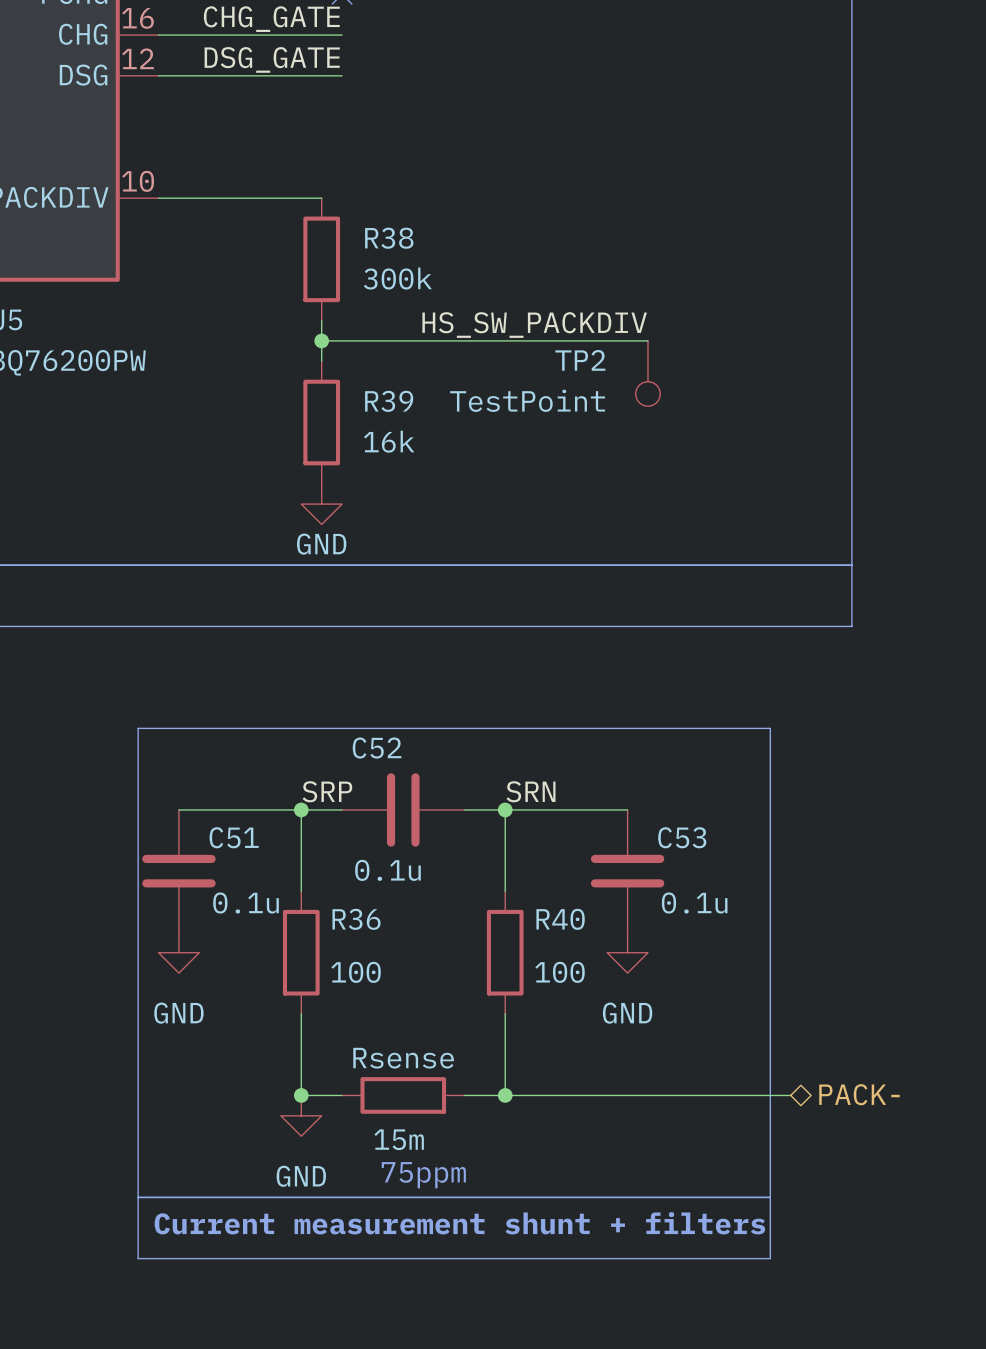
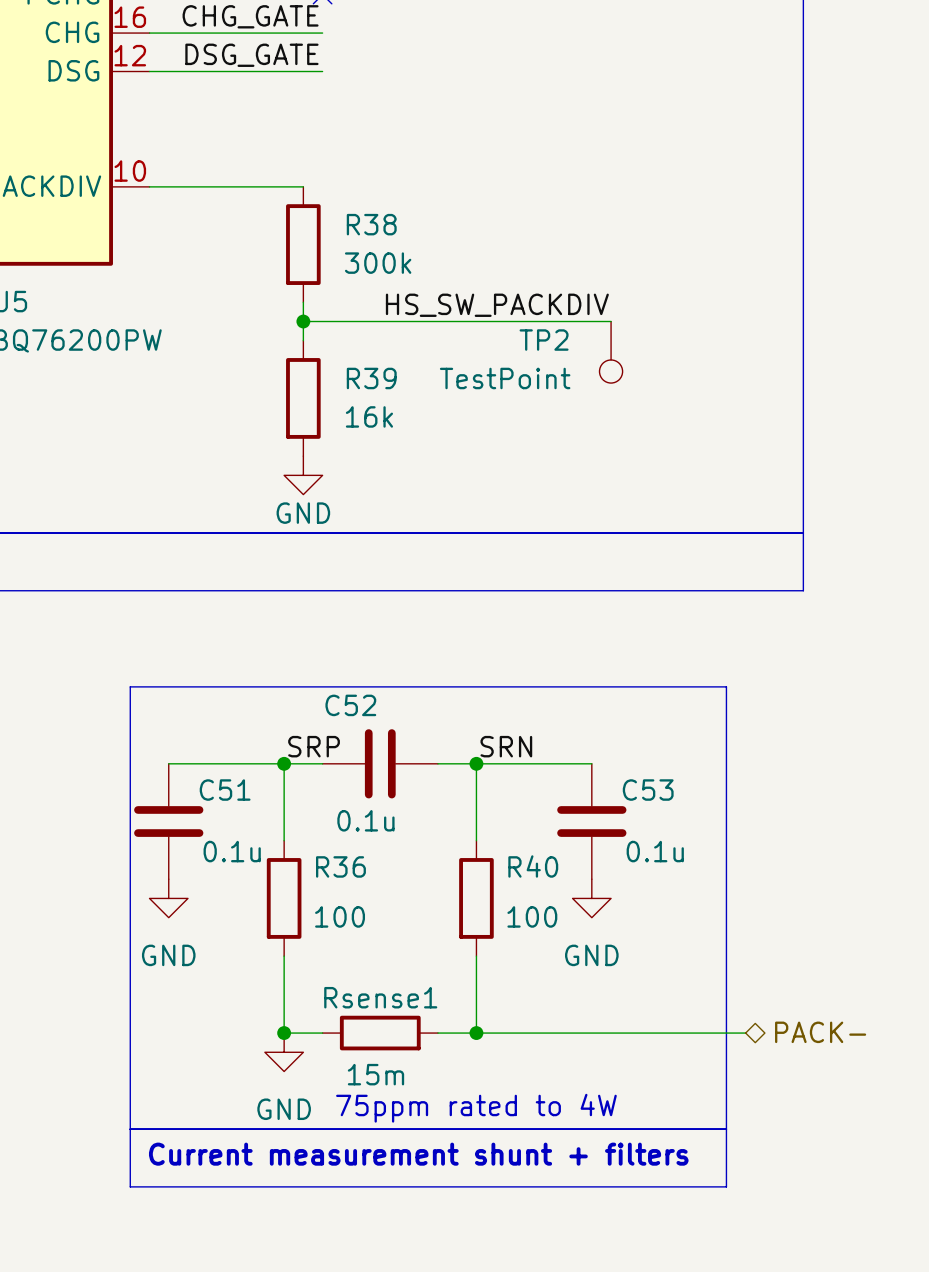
Rsense name: Rsense (403, 1058) -> Rsense1 (380, 997)
text: none -> 75ppm rated to 4W (476, 1108)
text: 75ppm (423, 1175) -> none

